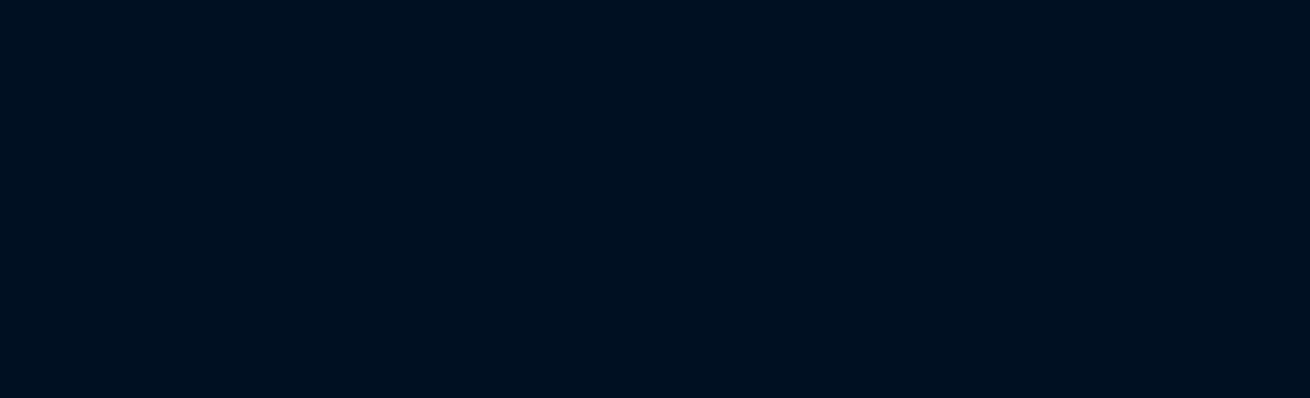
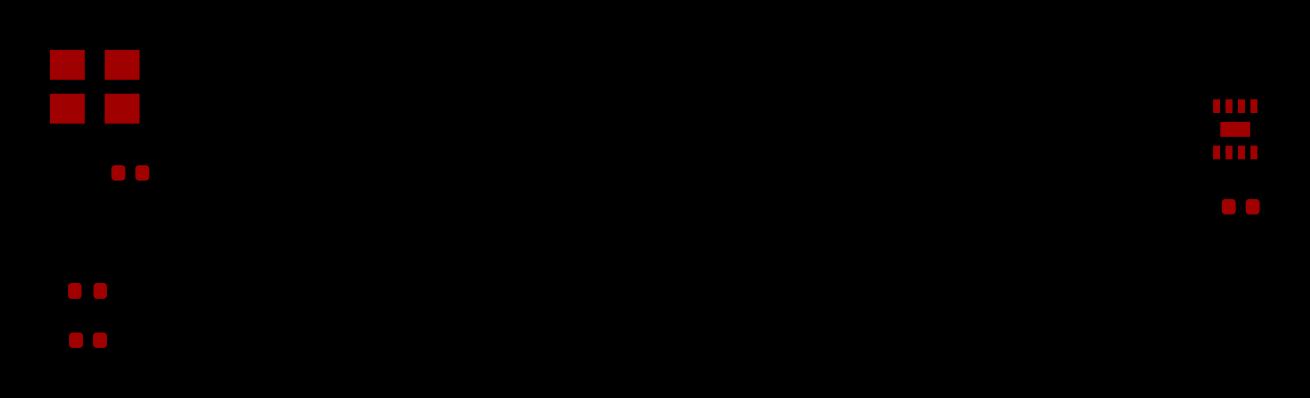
part: none -> (94, 86)
part: none -> (1235, 129)
part: none -> (130, 172)
part: none -> (1240, 206)
part: none -> (87, 290)
part: none -> (88, 340)

